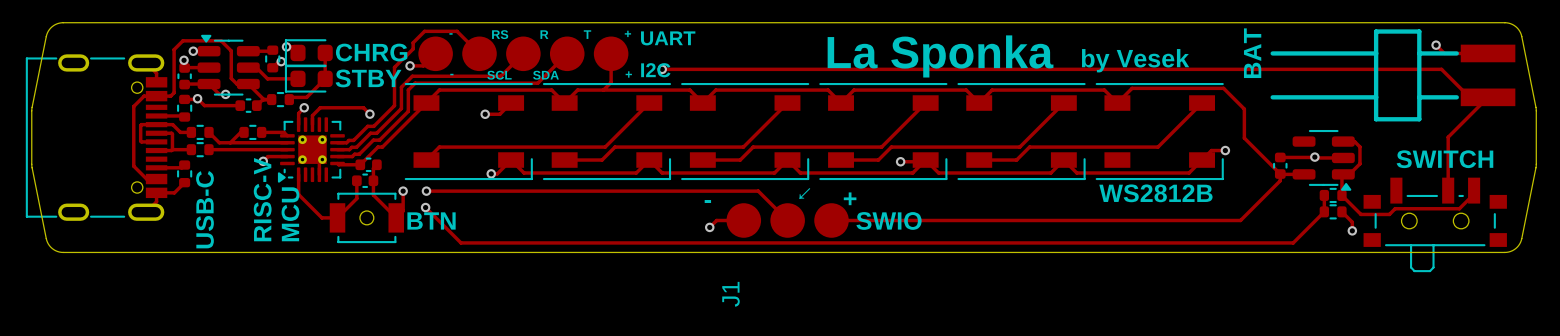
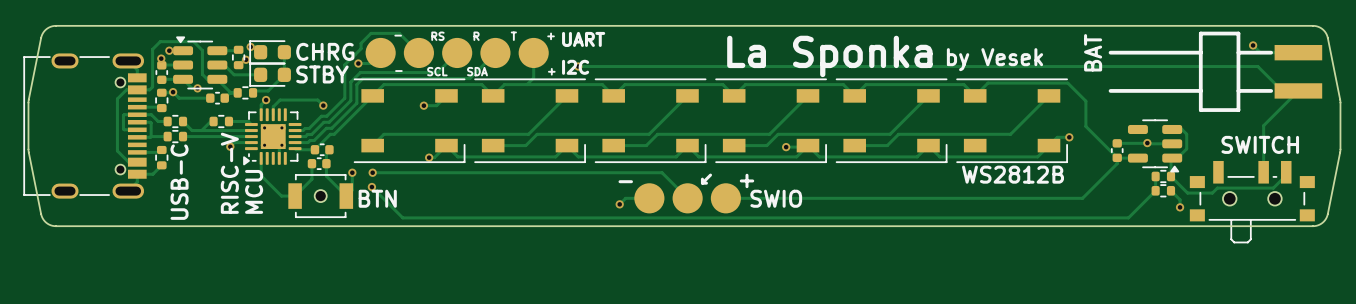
J1 name: J1 (730, 294) -> none

